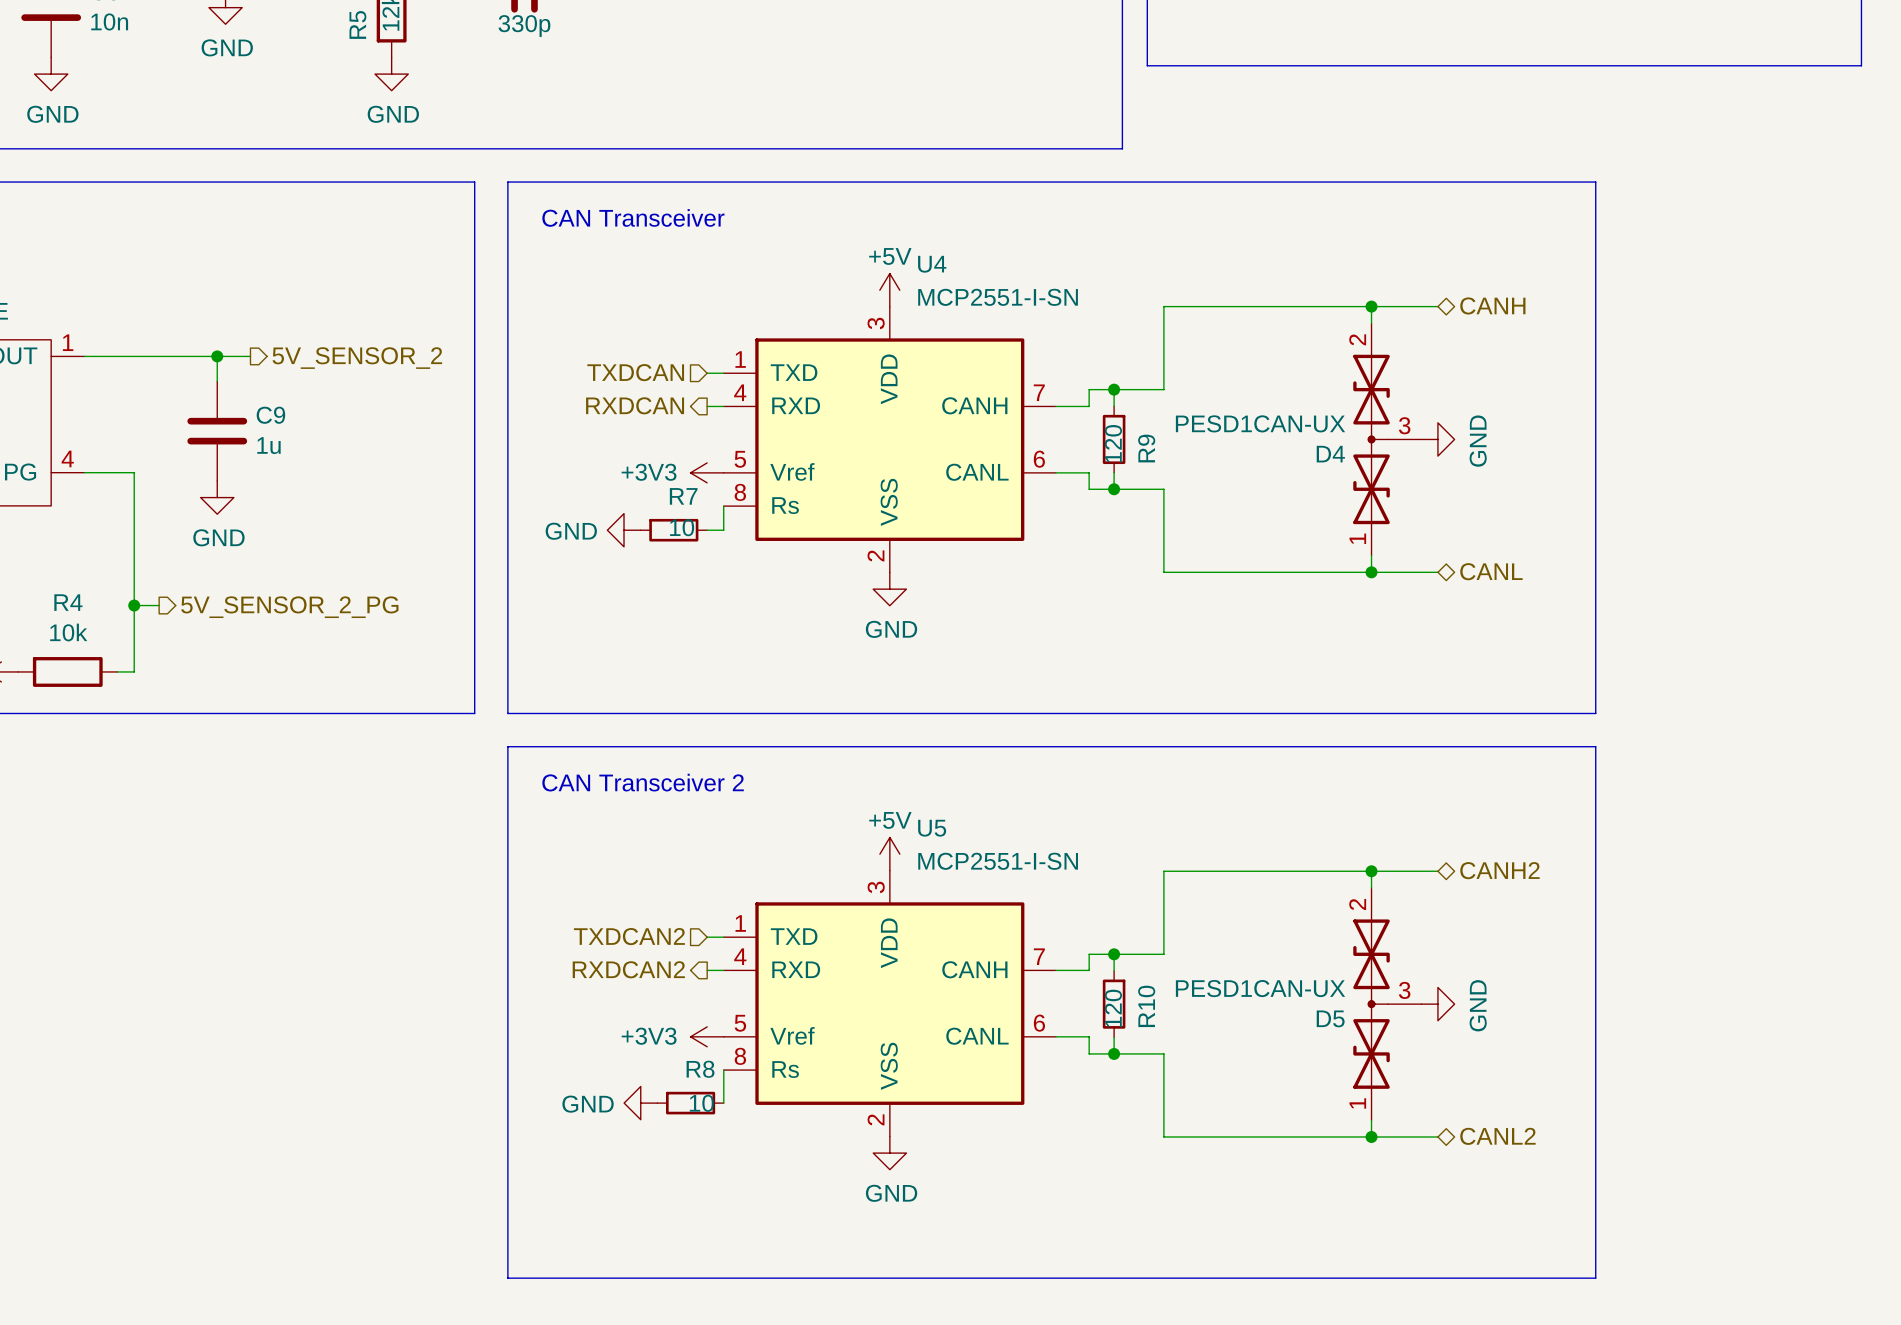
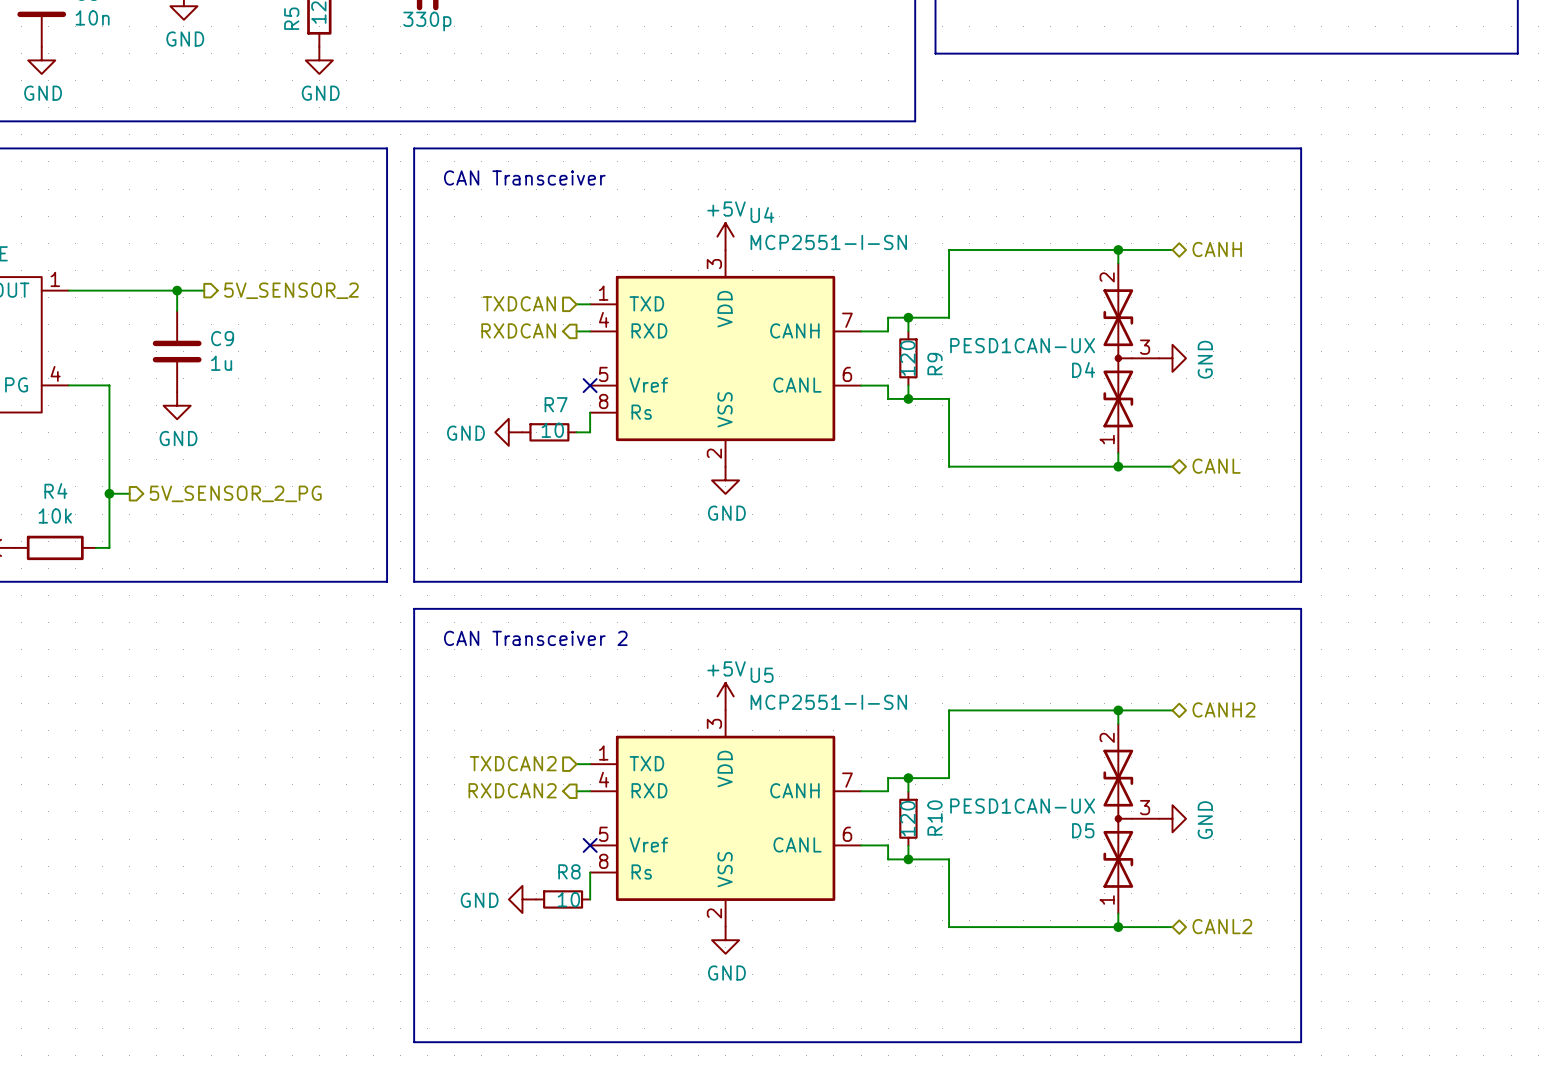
power symbol: +3V3 (707, 472) -> none
no-connect mark: none -> (590, 385)
power symbol: +3V3 (707, 1036) -> none
no-connect mark: none -> (590, 845)

